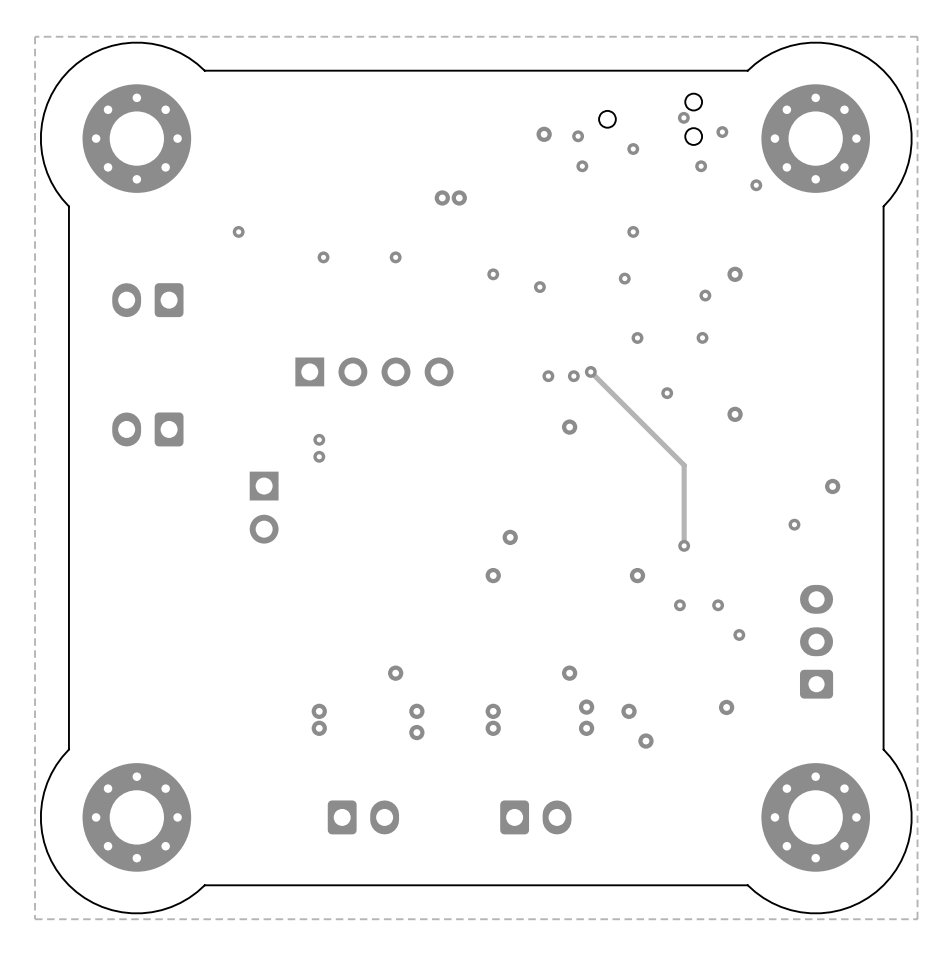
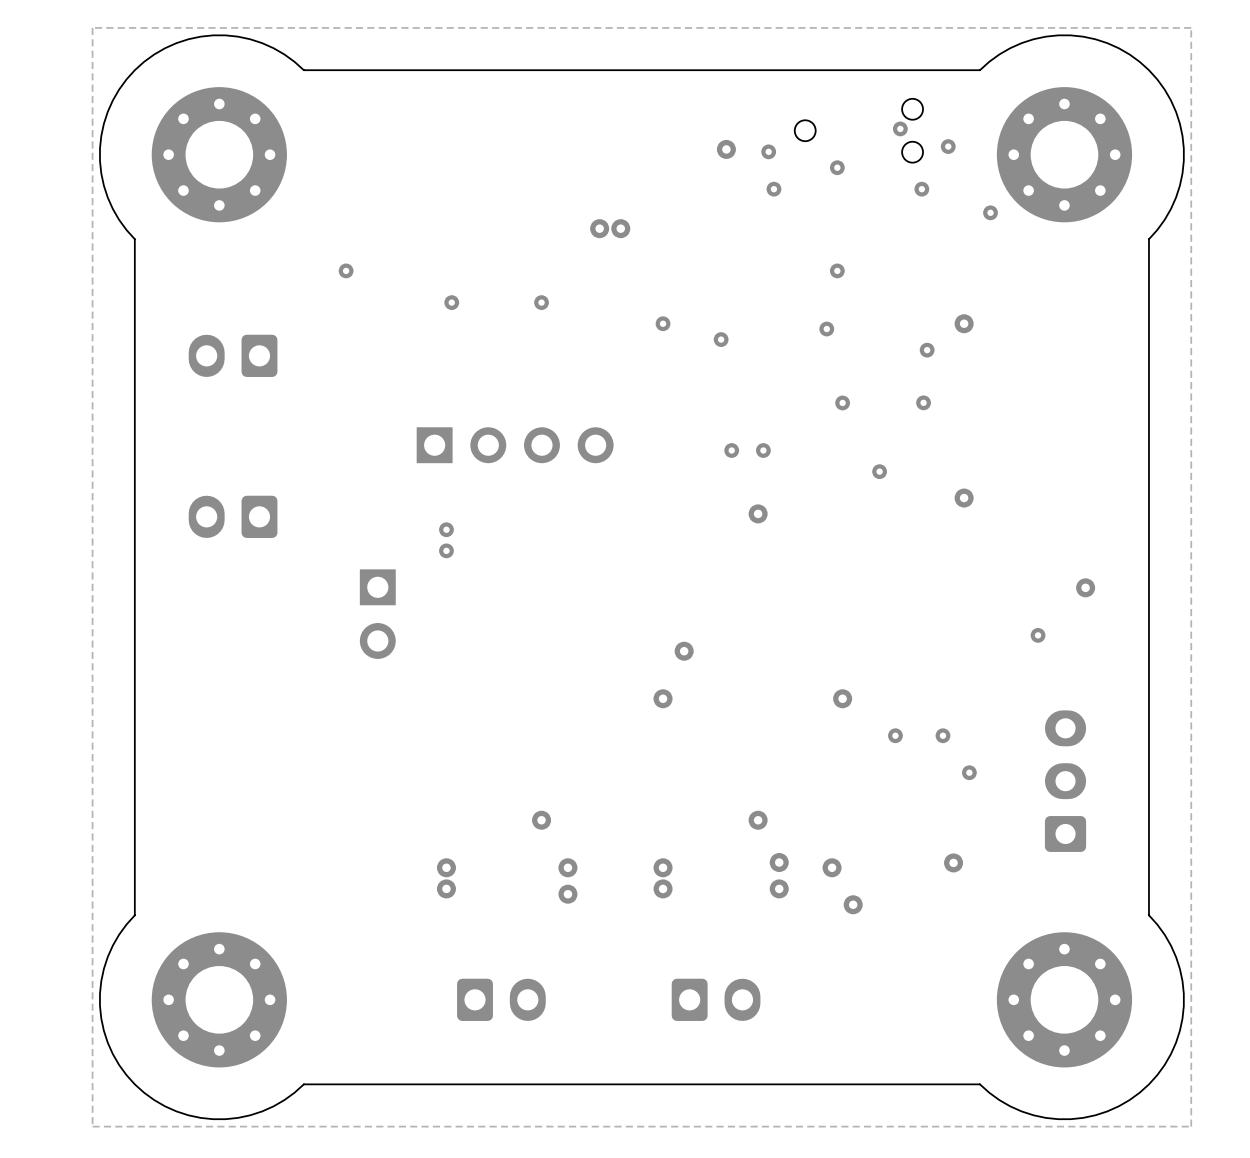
track: (590, 371) (684, 465) (684, 545) -> none
via: (590, 371) -> none
via: (684, 545) -> none

